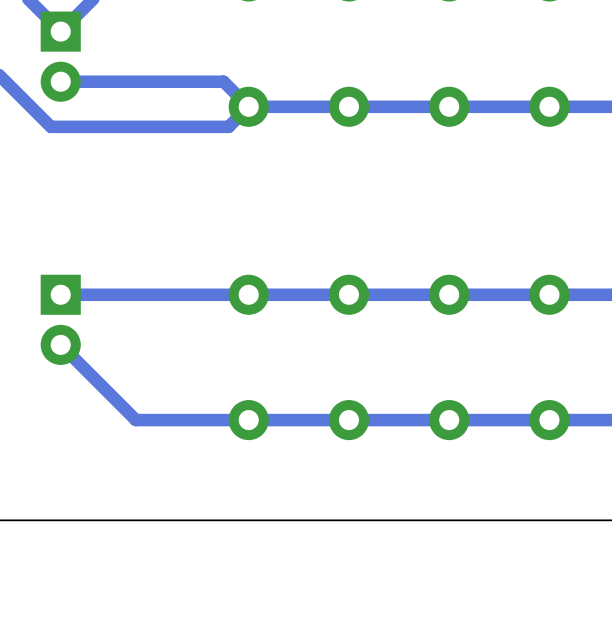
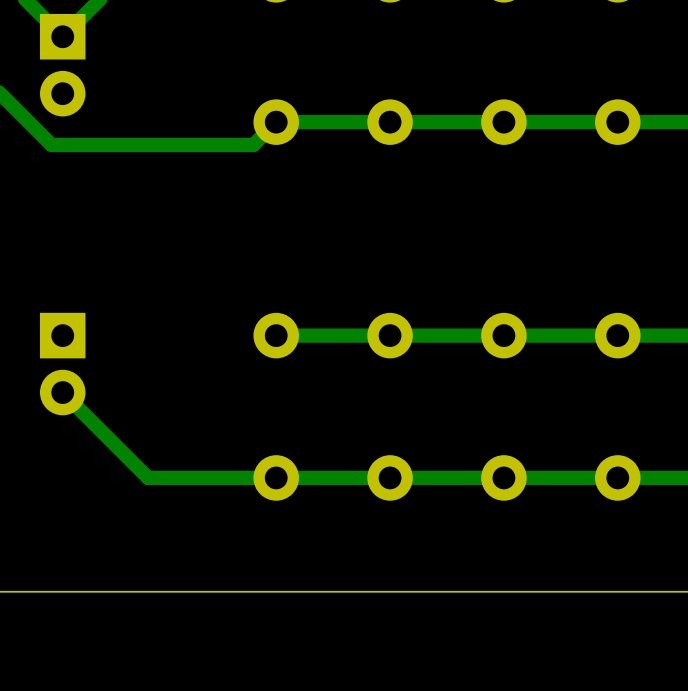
track: (60, 81) (223, 81) (248, 106) -> none
track: (248, 294) (60, 294) -> none

